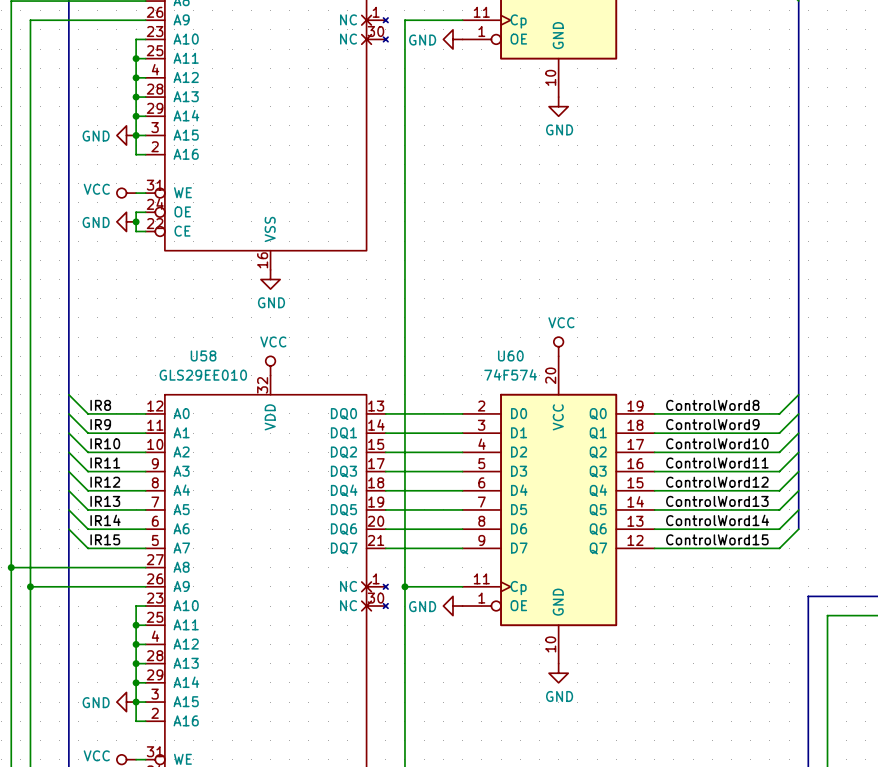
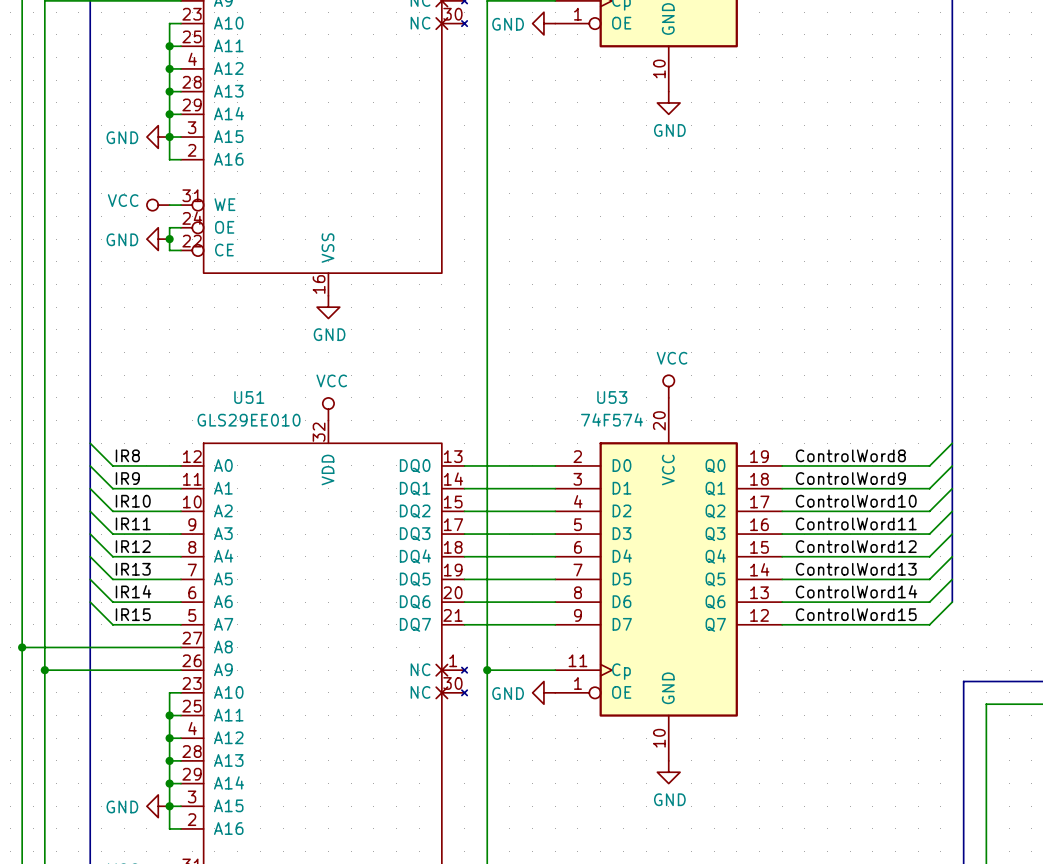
U58 name: U58 (203, 355) -> U51 (249, 397)
U60 name: U60 (510, 355) -> U53 (612, 397)

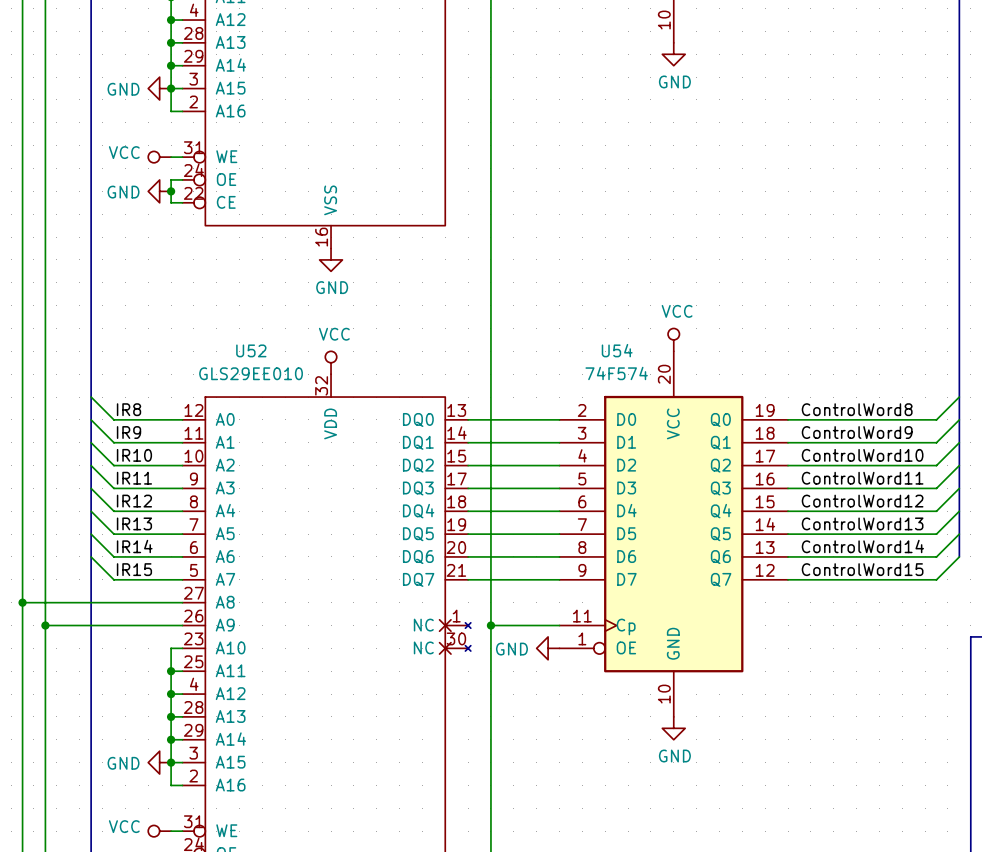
U51 name: U51 (249, 397) -> U52 (251, 350)
U53 name: U53 (612, 397) -> U54 (617, 350)

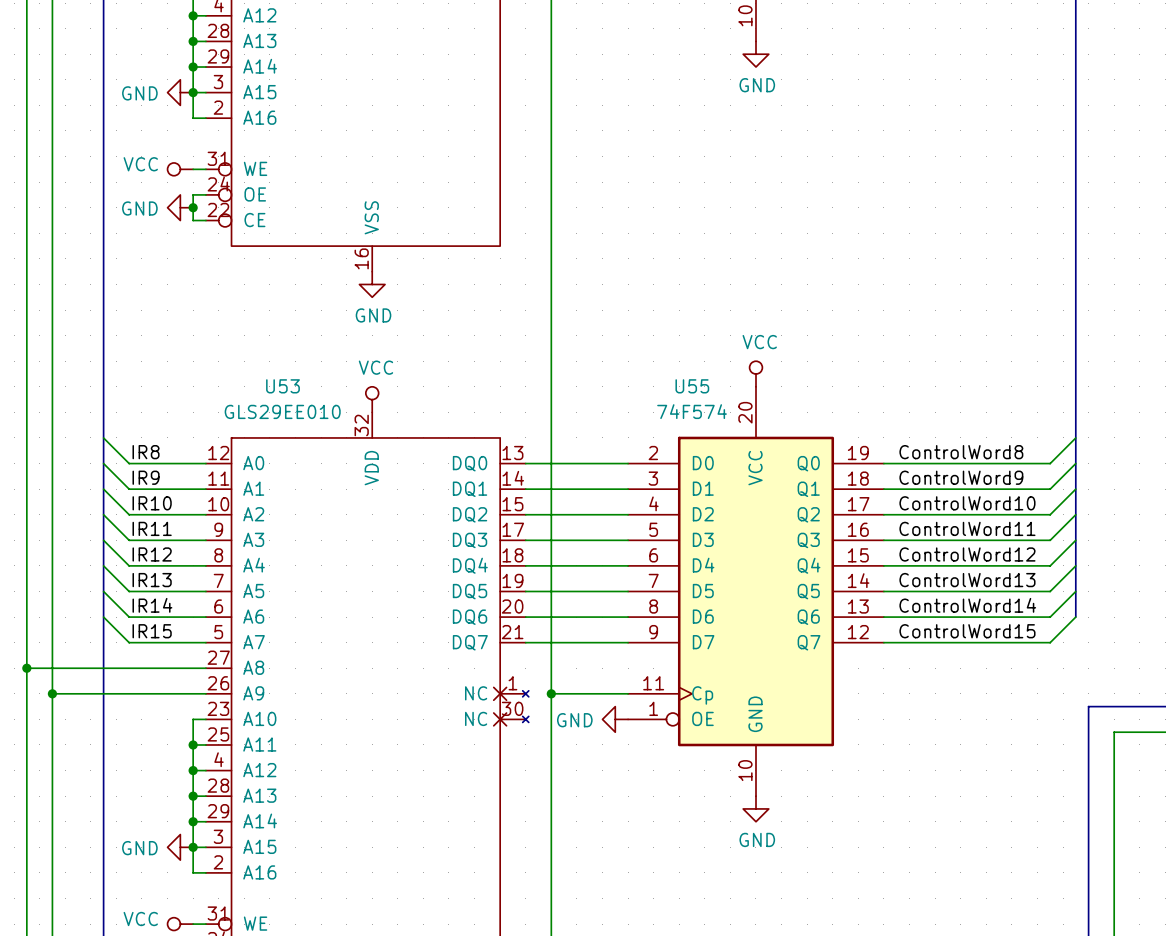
U52 name: U52 (251, 350) -> U53 (282, 386)
U54 name: U54 (617, 350) -> U55 (692, 386)

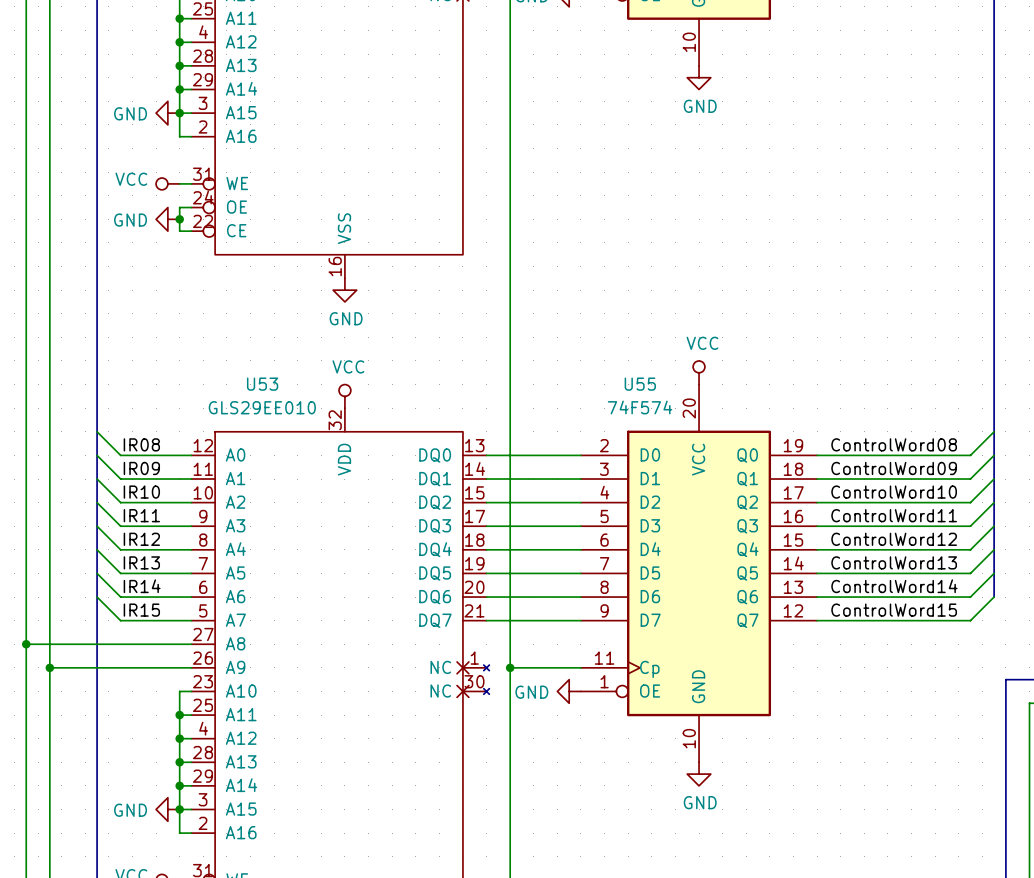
label: IR8 (146, 452) -> IR08 (141, 444)
label: ControlWord8 (961, 452) -> ControlWord08 (894, 444)
label: IR9 (146, 477) -> IR09 (141, 468)
label: ControlWord9 (961, 477) -> ControlWord09 (894, 468)

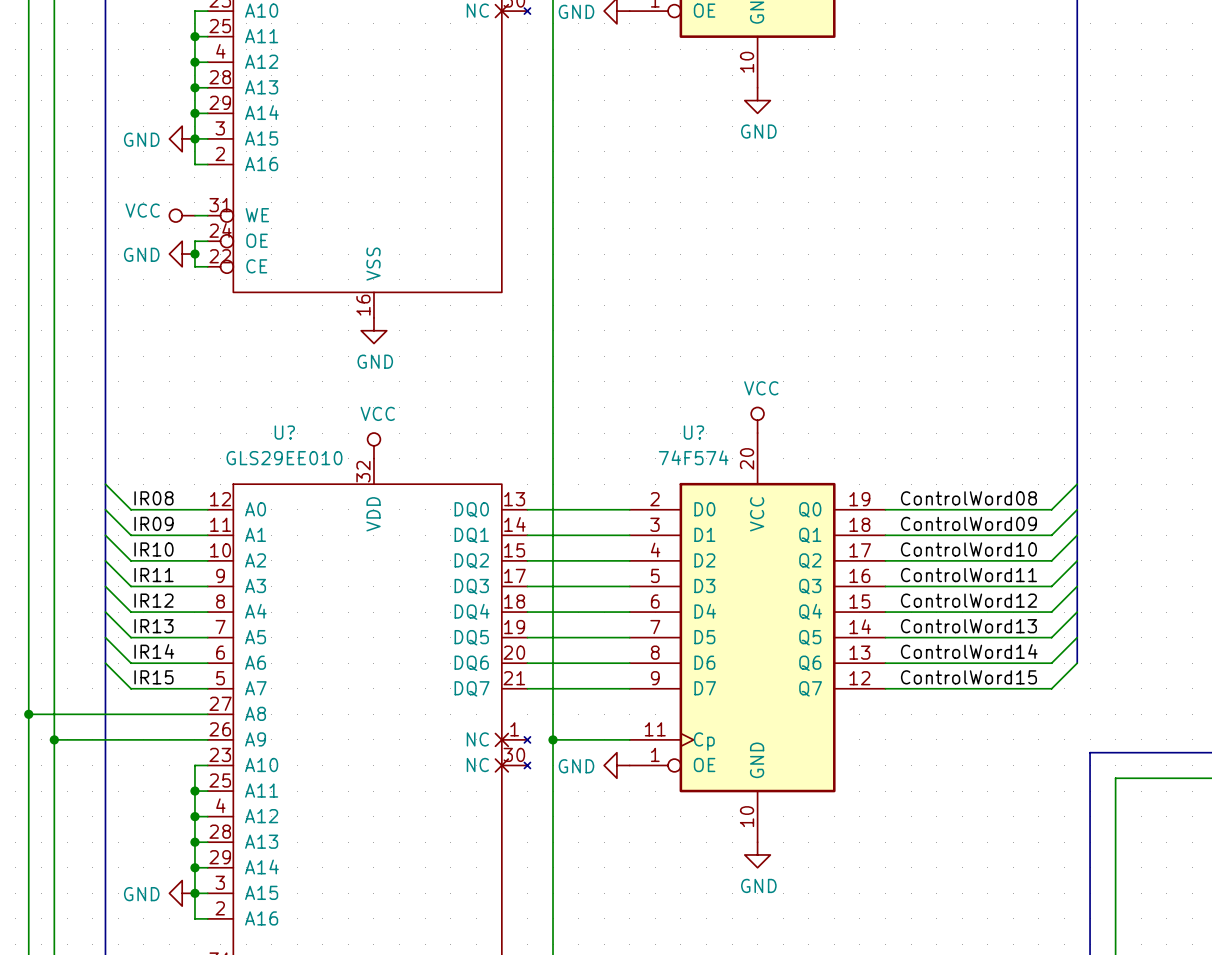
U53 name: U53 (262, 384) -> U? (284, 432)
U55 name: U55 (640, 384) -> U? (693, 432)

